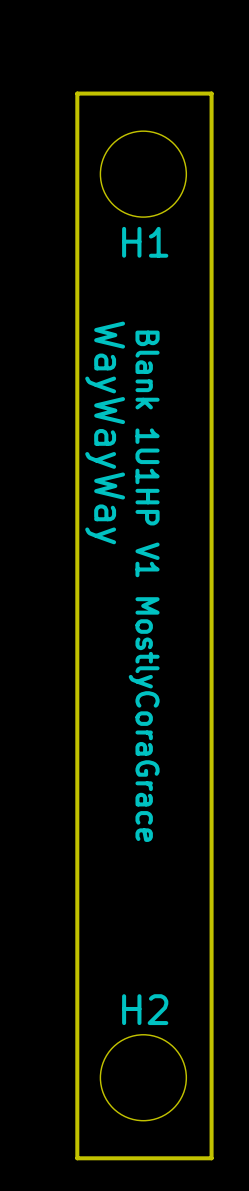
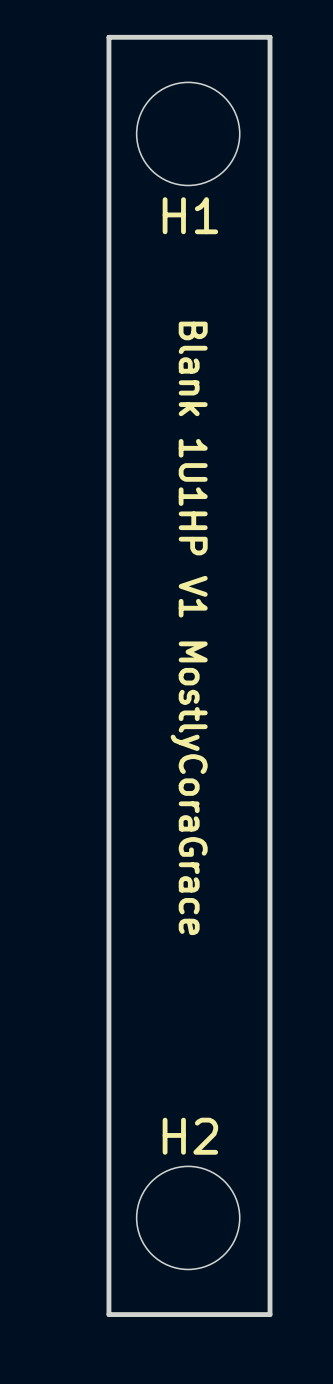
text: WayWayWay (105, 432) -> none

